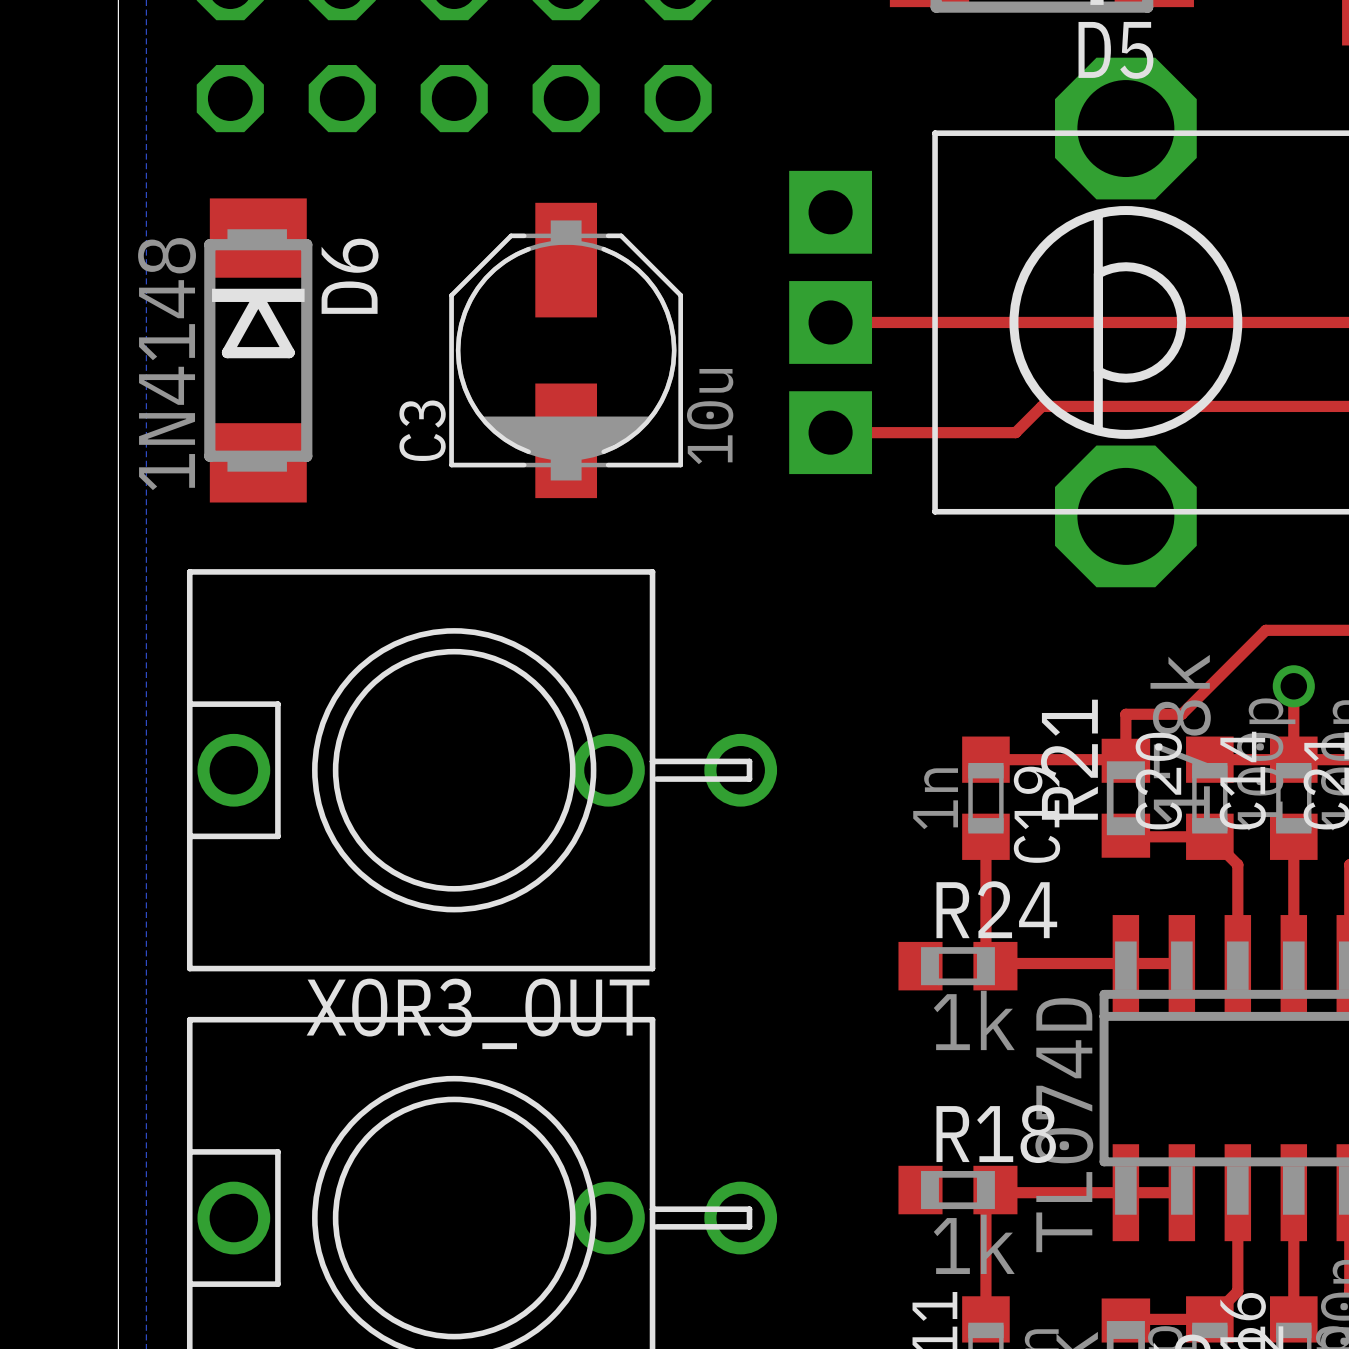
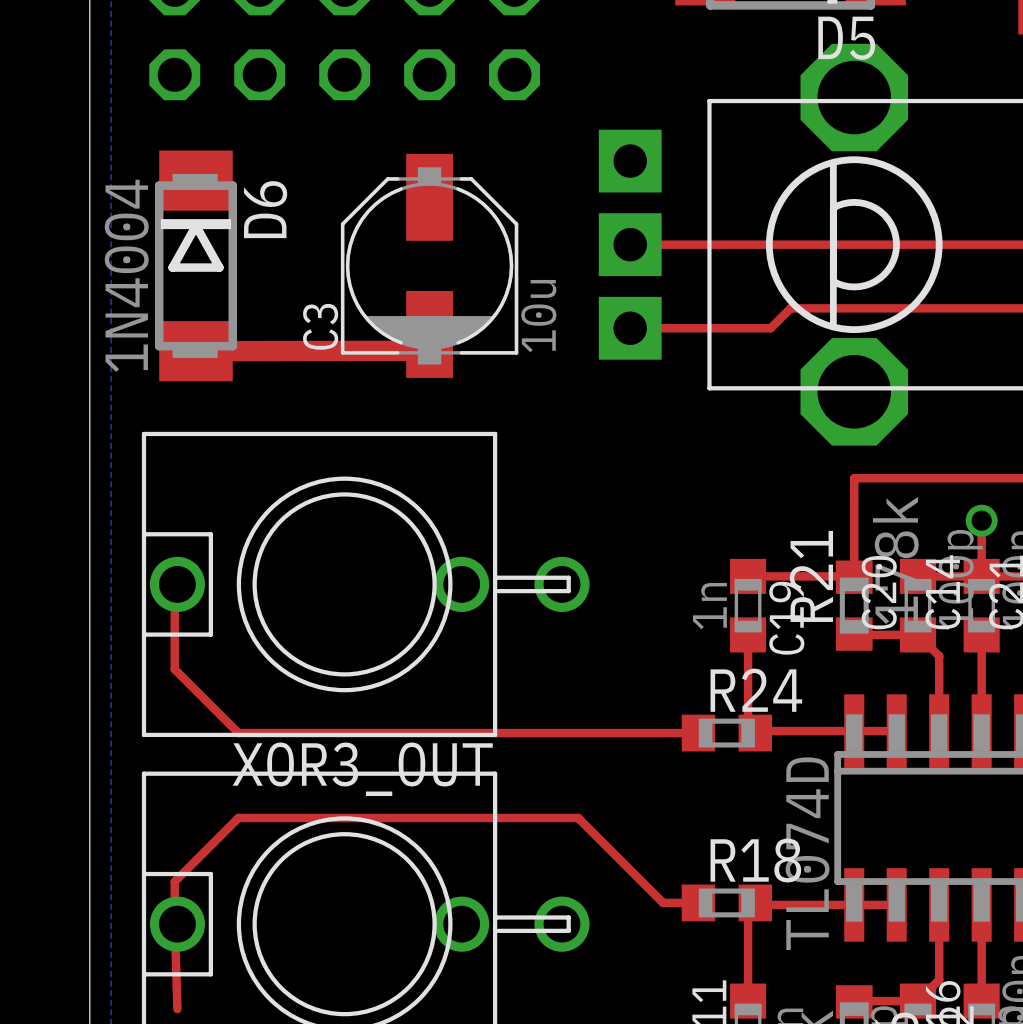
D6 value: 1N4148 (167, 364) -> 1N4004 (126, 275)
top track: none -> (195, 351) (413, 350)
top track: (1265, 630) (1181, 714) (1125, 714) -> (960, 478) (854, 478) (854, 541)
top track: none -> (177, 584) (174, 587) (174, 669) (238, 733) (698, 733)
R24 value: 1k (974, 1020) -> none
top track: none -> (698, 902) (663, 902) (578, 818) (238, 818) (174, 881) (177, 1009)
R18 value: 1k (974, 1244) -> none

